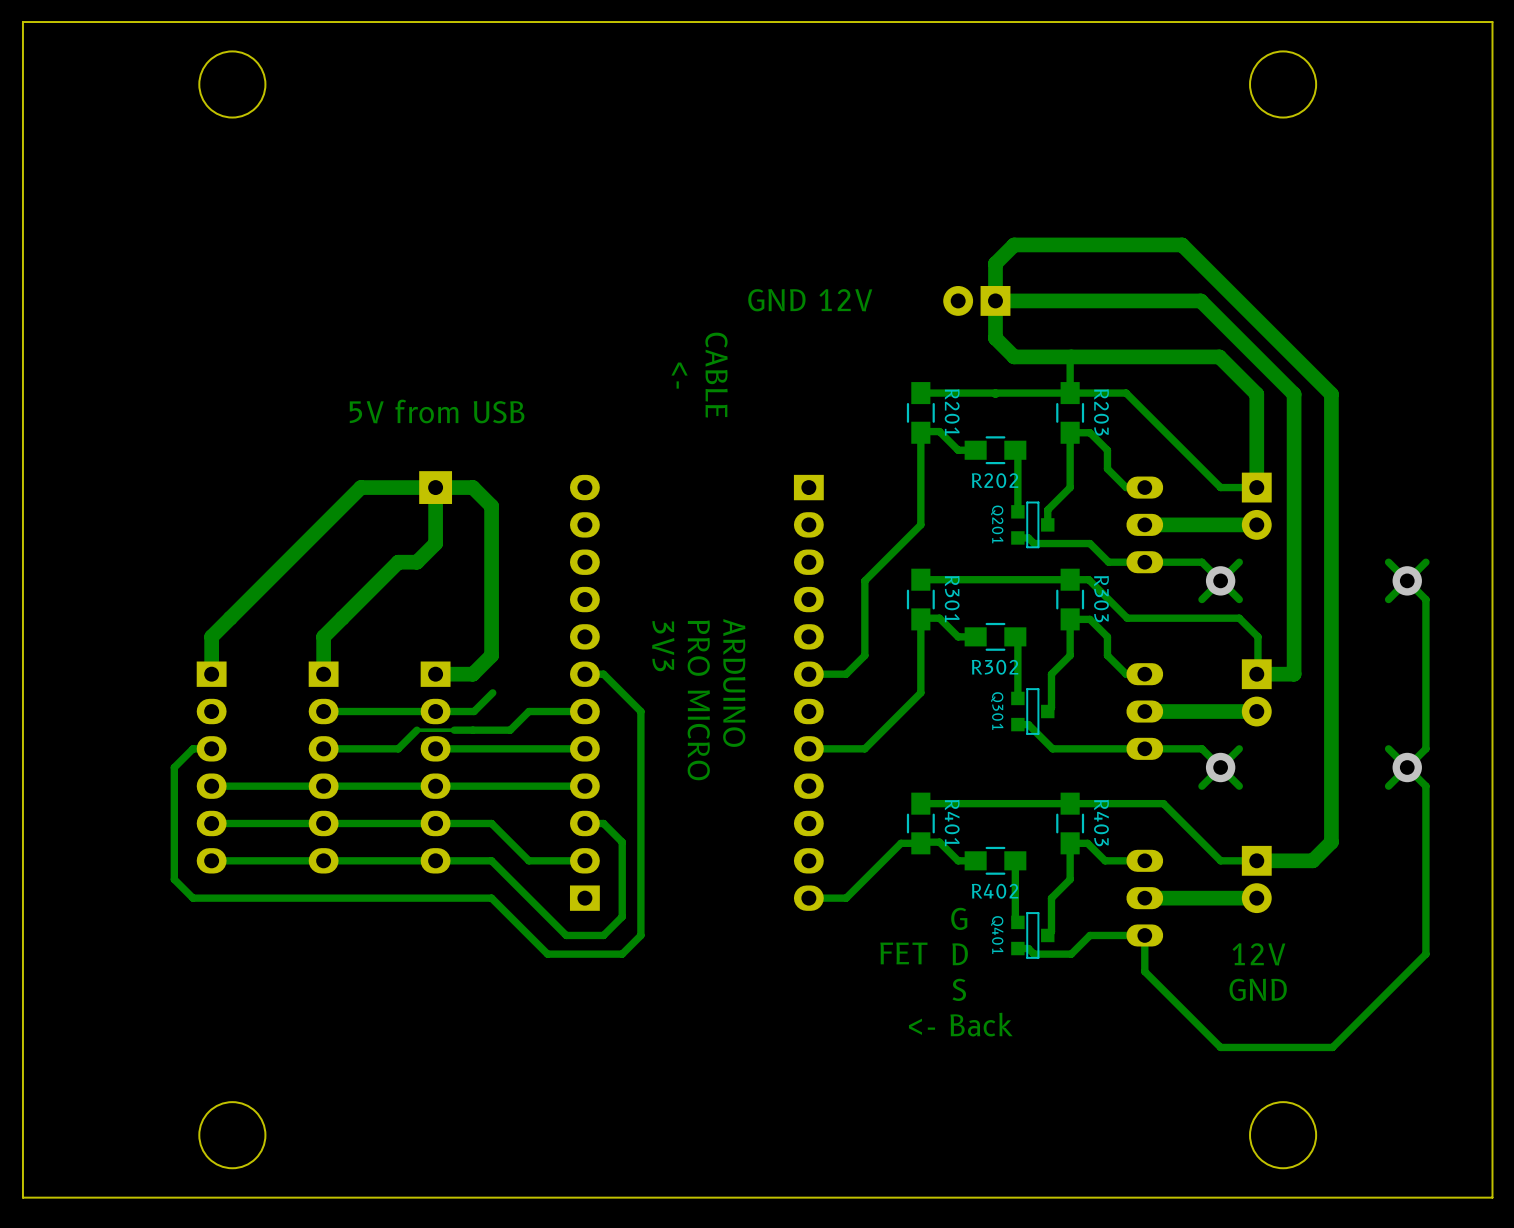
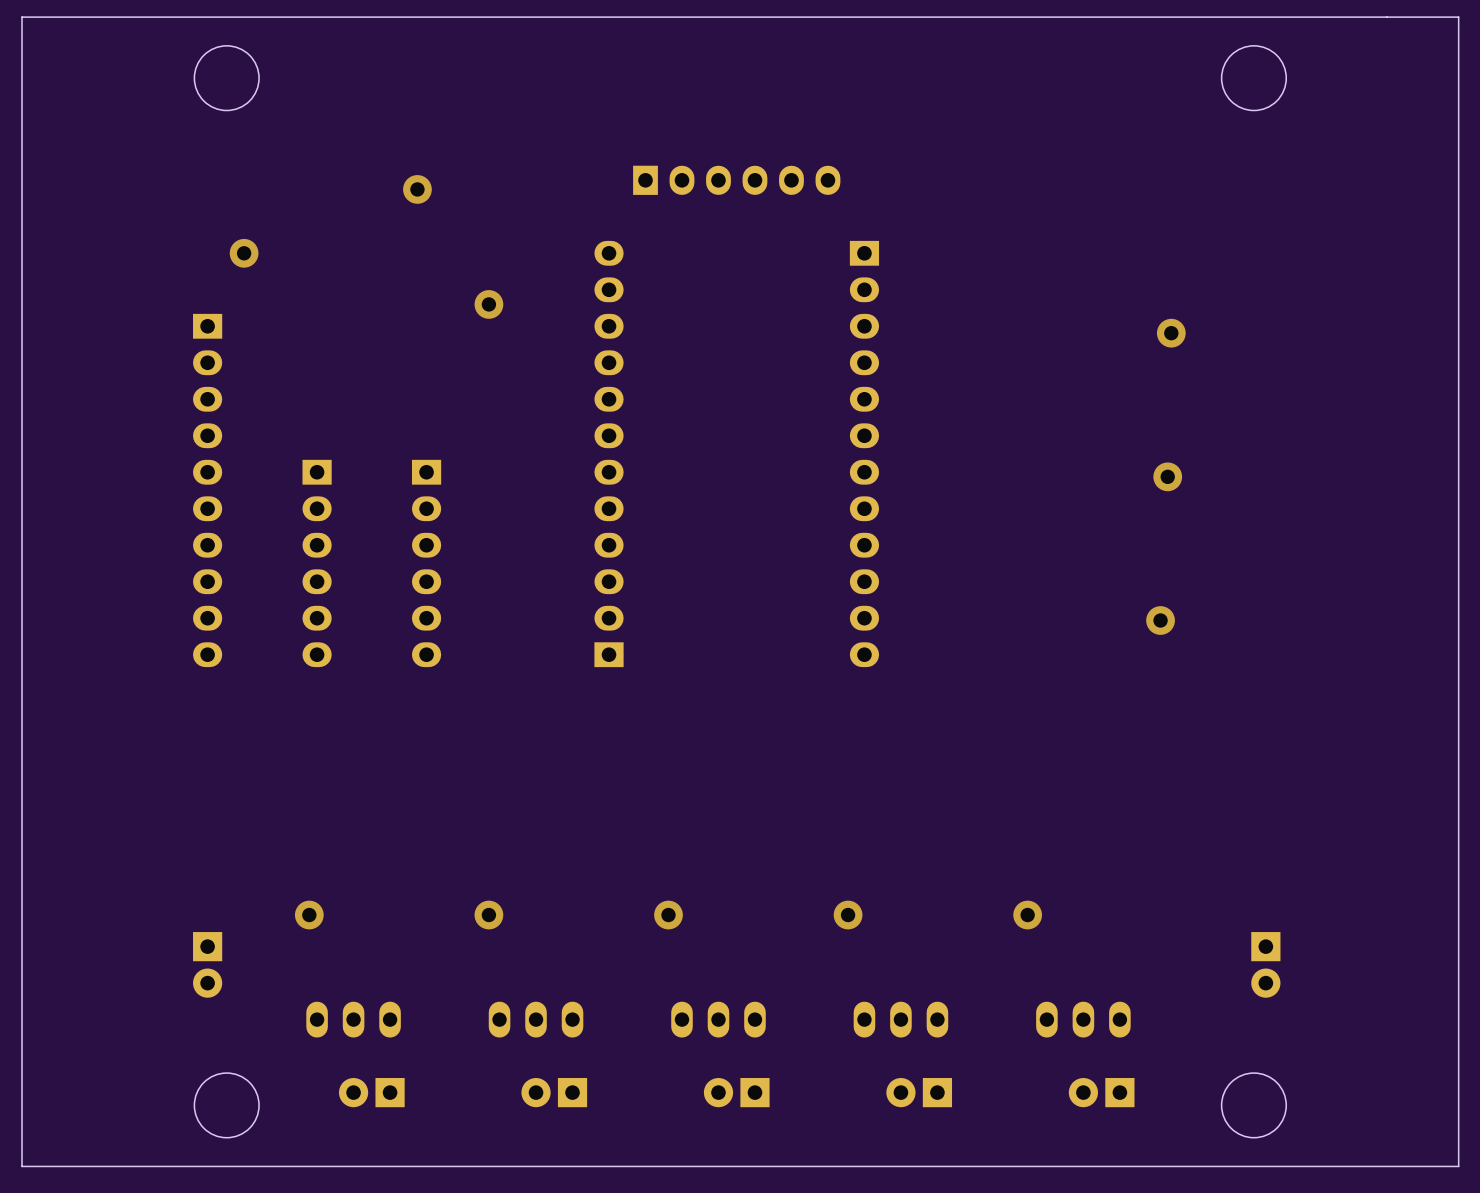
part: none -> (736, 180)
via: none -> (417, 189)
via: none -> (244, 253)
text: GND 12V (810, 300) -> none
part: (976, 300) -> none
track: (995, 300) (1200, 300) (1294, 394) (1294, 674) (1256, 674) (1257, 636) (1239, 618) (1127, 618) (1088, 579) (920, 579) -> none
via: none -> (488, 304)
via: none -> (1171, 333)
track: (1071, 356) (1070, 393) -> none
text: <- (679, 375) -> none
text: CABLE (716, 375) -> none
track: (920, 393) (1126, 393) (1220, 487) (1256, 487) (1256, 394) (1219, 356) (1014, 356) (995, 338) (995, 263) (1014, 244) (1182, 244) (1331, 394) (1331, 842) (1312, 860) (1220, 860) (1163, 803) (920, 803) -> none
text: 5V from USB (437, 411) -> none
R201: (920, 412) -> none
R203: (1070, 412) -> none
track: (975, 450) (958, 450) (939, 431) (920, 432) (920, 524) (864, 580) (864, 655) (846, 674) (808, 674) -> none
R202: (995, 450) -> none
track: (1015, 450) (1017, 452) (1017, 511) -> none
part: none -> (609, 454)
part: none -> (864, 454)
track: (435, 487) (435, 543) (416, 562) (398, 562) (323, 636) (323, 674) -> none
part: (435, 487) -> none
track: (1144, 487) (1126, 487) (1107, 468) (1107, 450) (1089, 432) (1070, 432) (1070, 487) (1047, 509) (1047, 524) -> none
via: none -> (1167, 476)
part: none -> (207, 490)
part: (1256, 506) -> none
Q201: (1032, 524) -> none
part: (1144, 524) -> none
track: (1256, 524) (1144, 524) -> none
track: (1017, 537) (1028, 537) (1033, 543) (1089, 543) (1108, 562) (1201, 562) (1239, 599) -> none
track: (1239, 562) (1201, 599) -> none
track: (1388, 562) (1425, 599) (1425, 748) (1388, 786) -> none
track: (1425, 562) (1388, 599) -> none
part: none -> (317, 563)
part: none -> (426, 563)
via: (1220, 580) -> none
via: (1407, 580) -> none
R301: (920, 599) -> none
R303: (1070, 599) -> none
track: (975, 636) (958, 636) (939, 618) (922, 618) (920, 692) (864, 748) (808, 748) -> none
R302: (995, 636) -> none
track: (1015, 636) (1017, 639) (1017, 698) -> none
via: none -> (1160, 620)
text: 3V3 (663, 646) -> none
track: (435, 674) (472, 674) (491, 655) (491, 506) (472, 487) (360, 487) (211, 636) (211, 674) -> none
track: (584, 674) (603, 674) (640, 711) (640, 935) (622, 954) (547, 954) (491, 898) (192, 898) (174, 879) (174, 767) (192, 748) (211, 748) -> none
track: (1144, 674) (1126, 674) (1107, 655) (1107, 636) (1089, 619) (1070, 619) (1070, 655) (1051, 674) (1051, 707) (1047, 711) -> none
text: ARDUINO (734, 683) -> none
track: (492, 692) (474, 711) (323, 711) -> none
part: (584, 692) -> none
part: (808, 692) -> none
part: (1256, 692) -> none
text: PRO MICRO (698, 700) -> none
track: (584, 711) (528, 711) (510, 730) (416, 730) (398, 748) (323, 748) -> none
Q301: (1032, 711) -> none
part: (1144, 711) -> none
track: (1256, 711) (1144, 711) -> none
track: (1017, 724) (1028, 724) (1052, 748) (1201, 748) (1239, 786) -> none
track: (584, 748) (435, 748) -> none
track: (1239, 748) (1201, 786) -> none
track: (1388, 748) (1425, 786) (1425, 954) (1332, 1047) (1220, 1047) (1144, 971) (1144, 935) (1089, 935) (1071, 954) (1033, 954) (1028, 948) (1017, 948) -> none
part: (211, 767) -> none
part: (323, 767) -> none
part: (435, 767) -> none
via: (1220, 767) -> none
via: (1407, 767) -> none
track: (584, 786) (211, 786) -> none
track: (211, 823) (491, 823) (528, 860) (584, 860) -> none
track: (584, 823) (603, 823) (622, 842) (622, 916) (603, 935) (566, 935) (491, 860) (211, 860) -> none
R401: (920, 823) -> none
R403: (1070, 823) -> none
track: (975, 860) (958, 860) (939, 842) (901, 843) (846, 898) (808, 898) -> none
R402: (995, 860) -> none
track: (1015, 860) (1015, 919) (1017, 922) -> none
track: (1144, 860) (1105, 860) (1087, 843) (1070, 843) (1070, 879) (1051, 898) (1051, 931) (1047, 935) -> none
part position: (1256, 879) -> (1265, 964)
part: (1144, 898) -> none
track: (1256, 898) (1144, 898) -> none
text: G (959, 918) -> none
Q401: (1032, 935) -> none
via: none -> (309, 915)
via: none -> (488, 915)
via: none -> (668, 915)
via: none -> (848, 915)
via: none -> (1027, 915)
text: FET (903, 953) -> none
text: D (960, 954) -> none
text: 12V (1258, 954) -> none
text: S (959, 989) -> none
text: GND (1258, 989) -> none
part: none -> (207, 964)
text: <- Back (960, 1024) -> none
part: none -> (353, 1019)
part: none -> (536, 1019)
part: none -> (718, 1019)
part: none -> (900, 1019)
part: none -> (1083, 1019)
part: none -> (371, 1092)
part: none -> (554, 1092)
part: none -> (736, 1092)
part: none -> (919, 1092)
part: none -> (1101, 1092)

